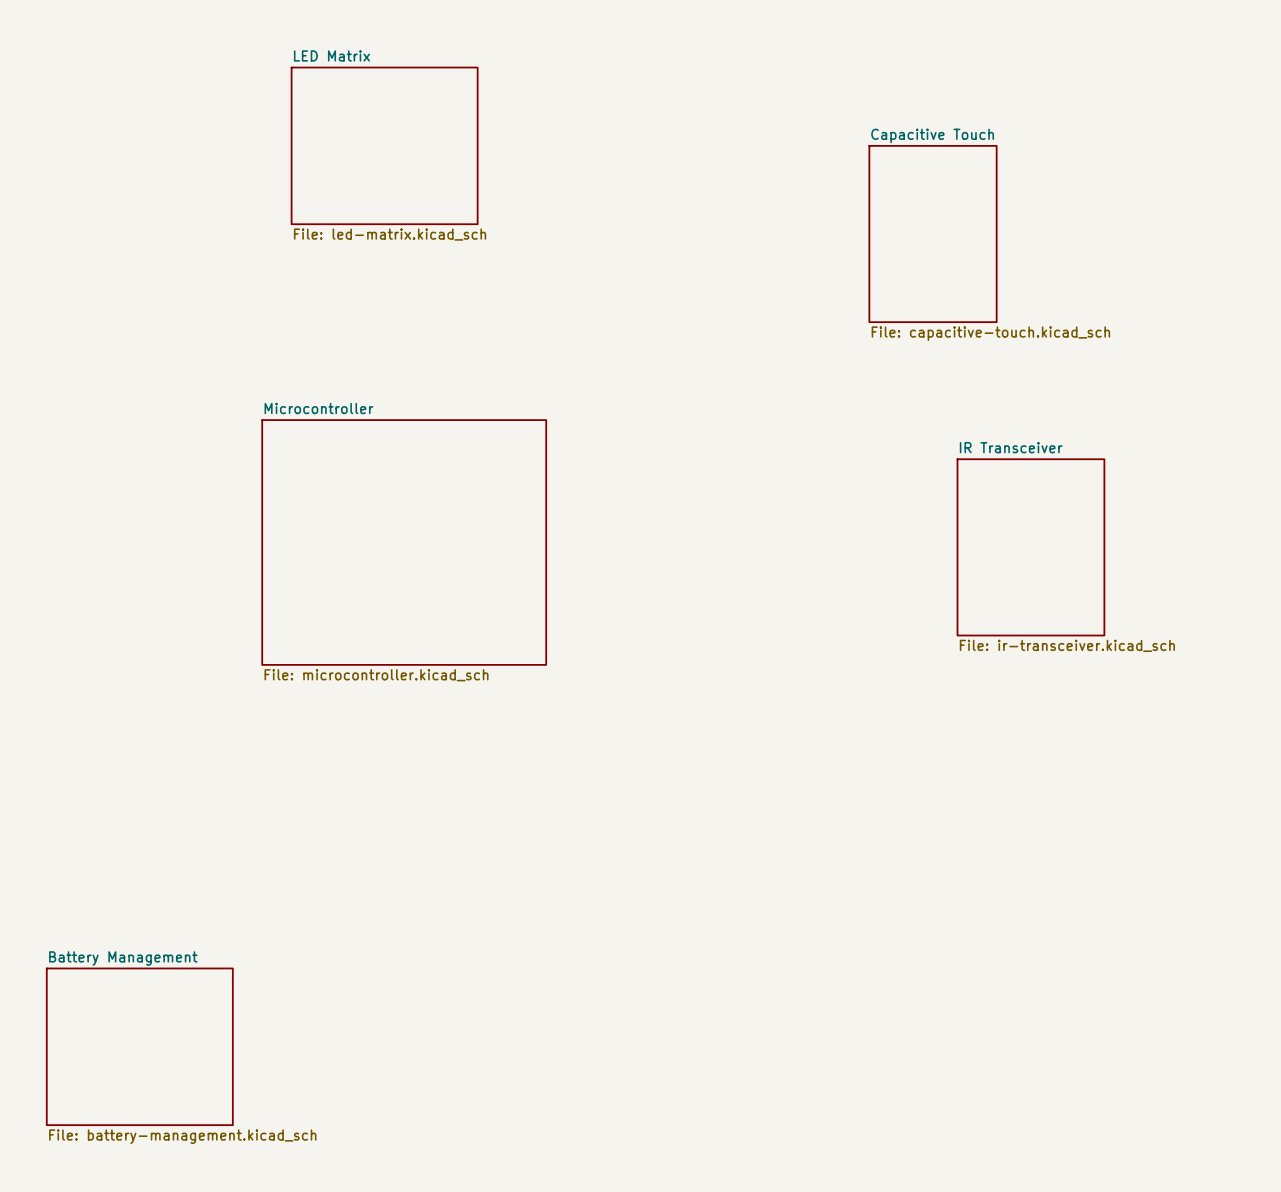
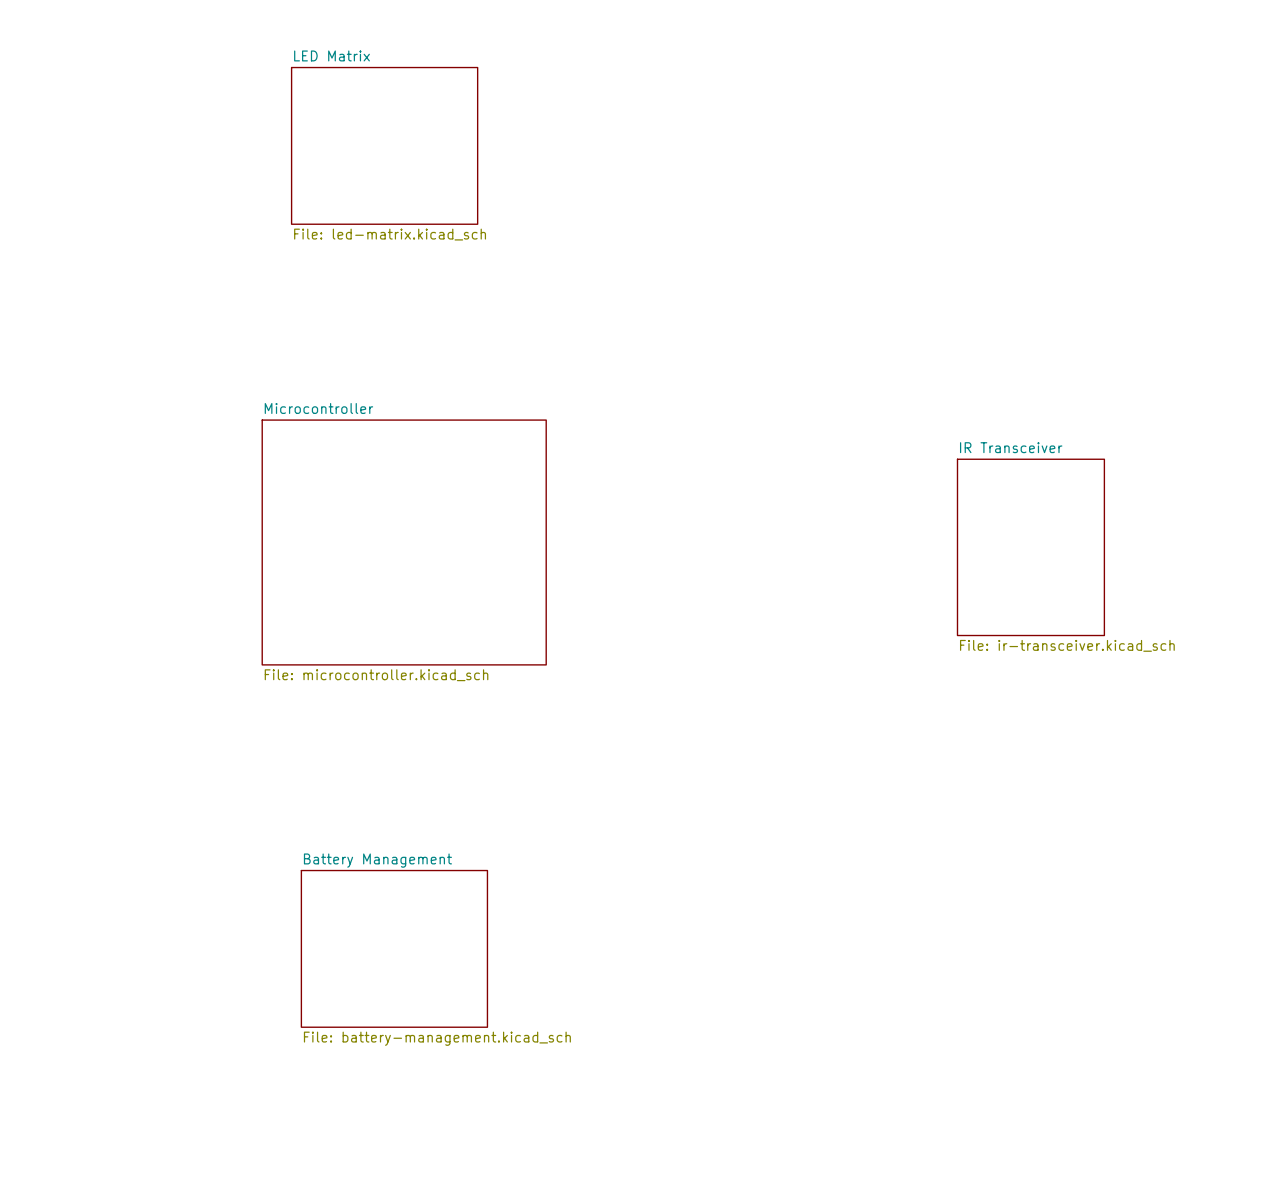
sheet Capacitive Touch: File: capacitive-touch.kicad_sch (933, 234) -> none
sheet Battery Management: none -> File: battery-management.kicad_sch (394, 948)
sheet Battery Management: File: battery-management.kicad_sch (139, 1046) -> none

